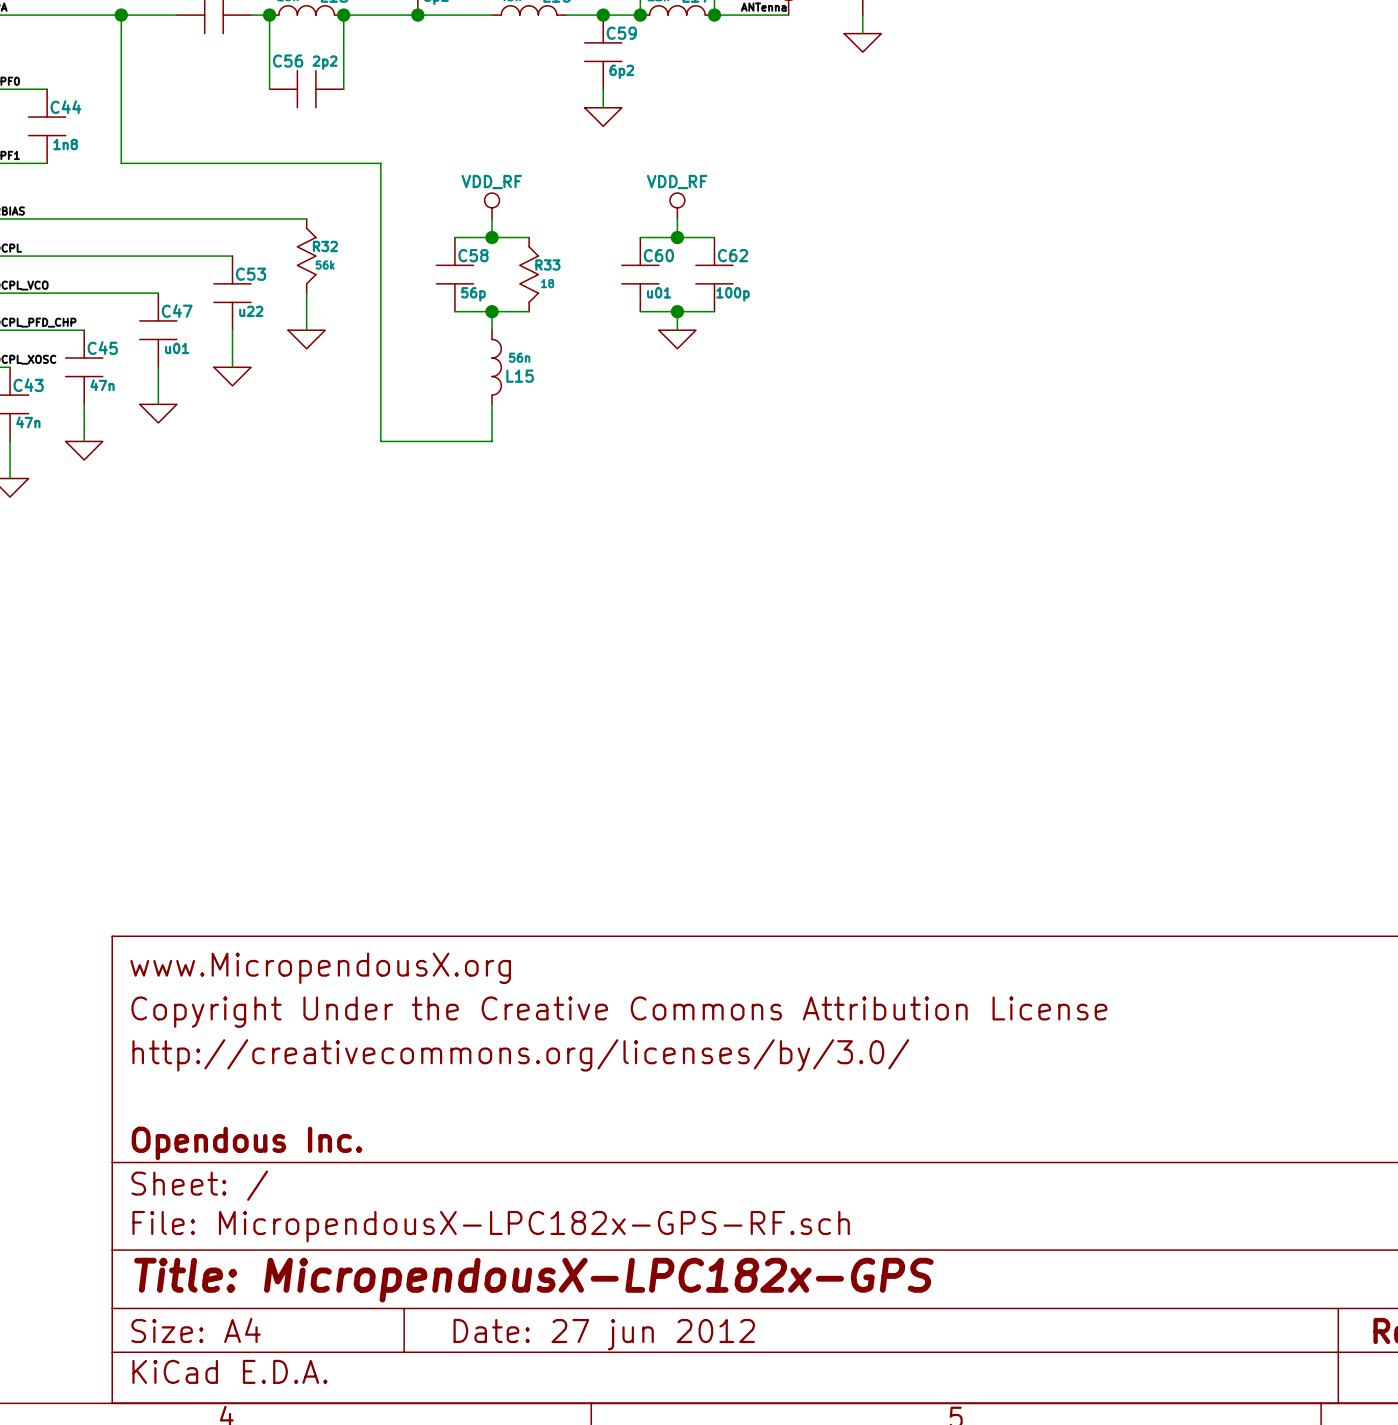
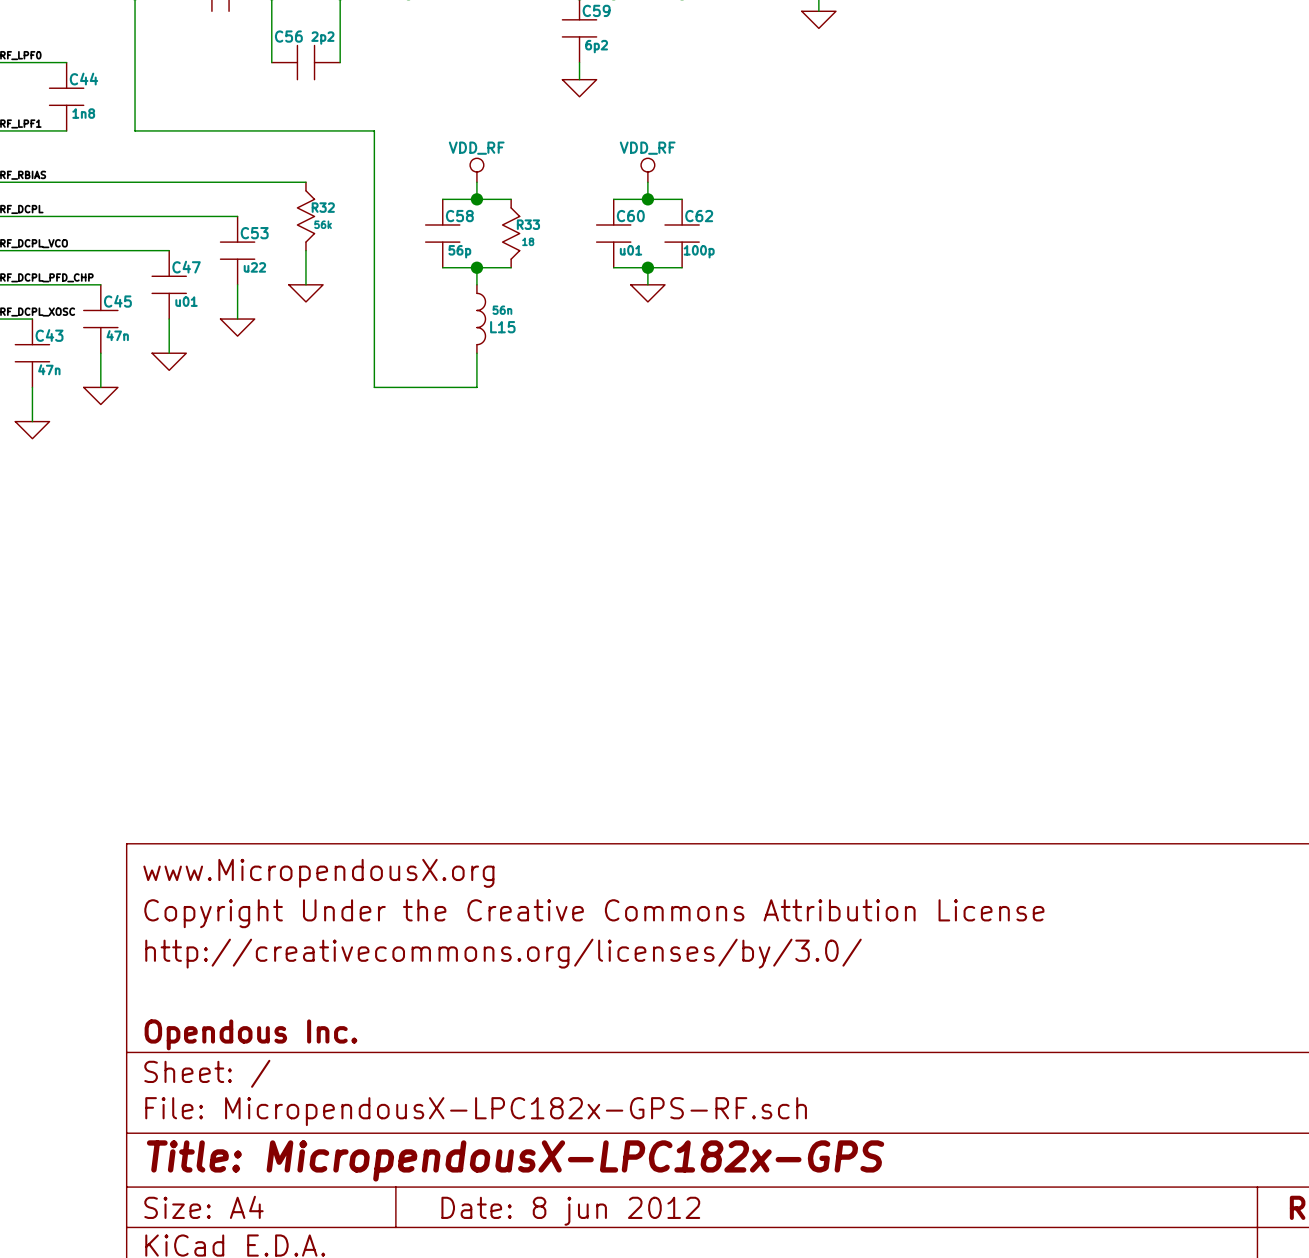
title block: Date: 27 jun 2012 (604, 1334) -> Date: 8 jun 2012 (570, 1211)

